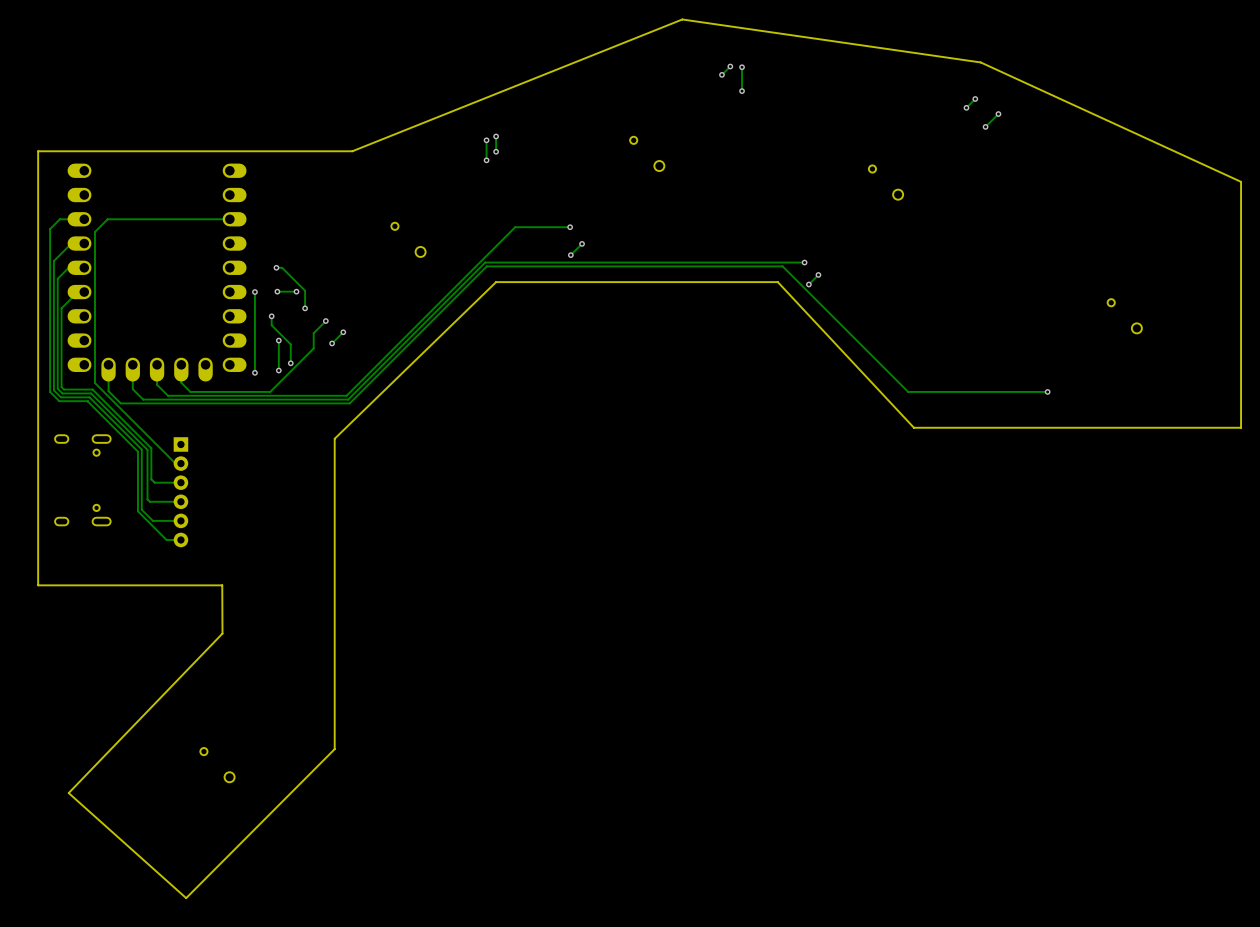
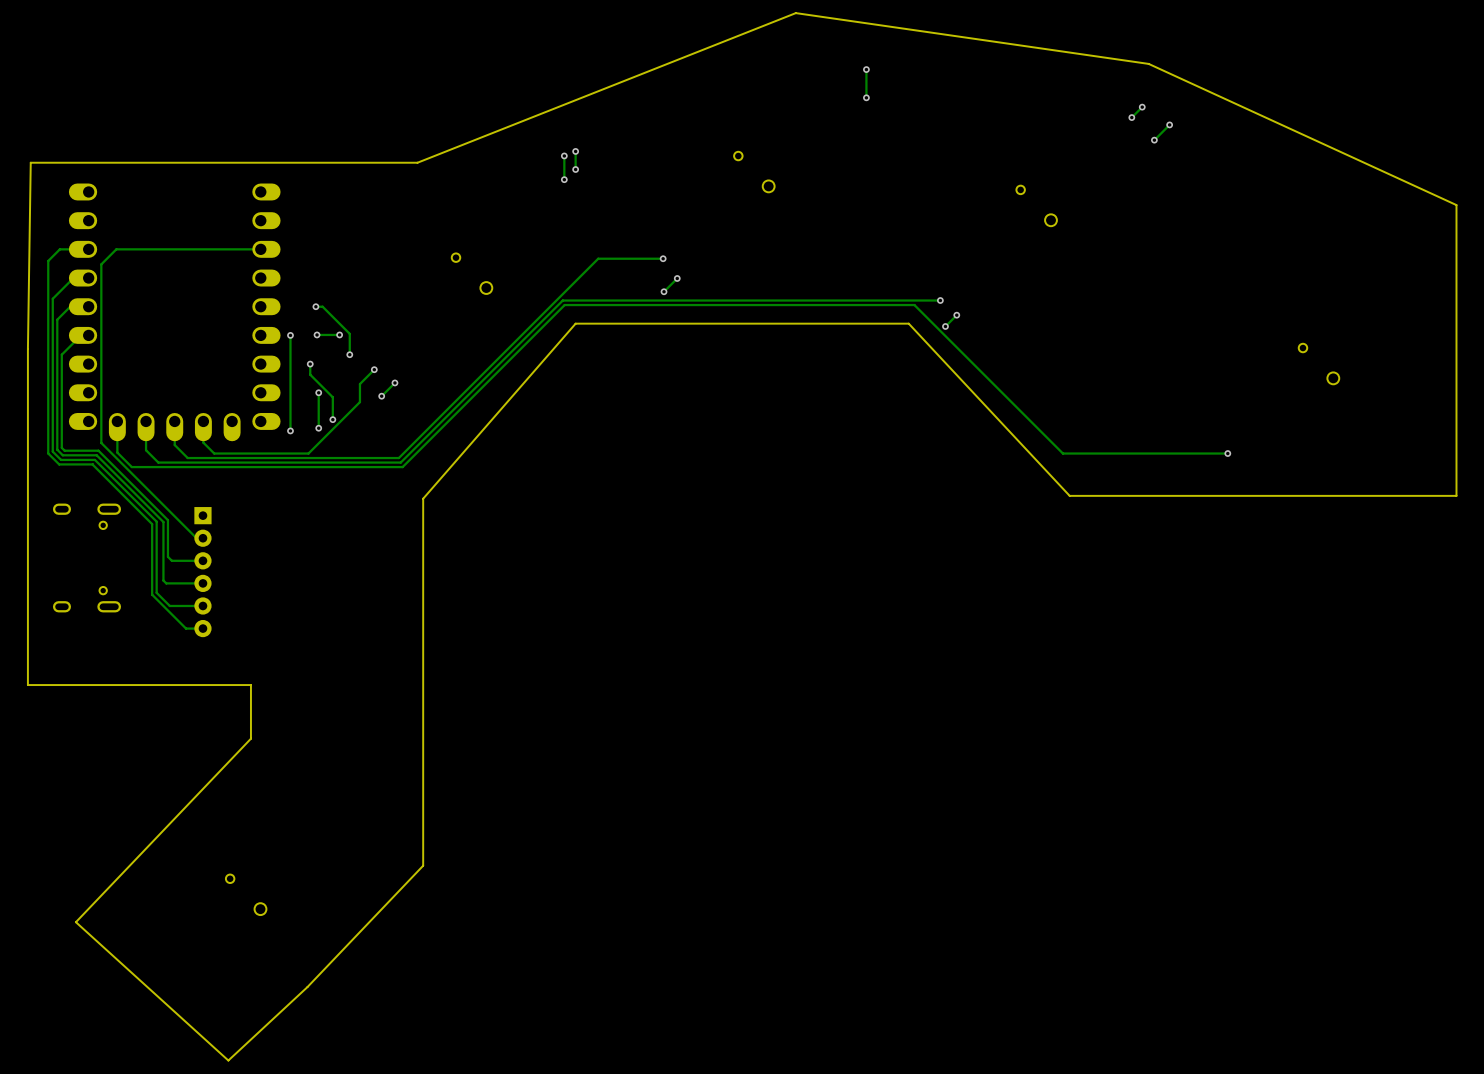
board edge: (682, 19) (352, 151) (38, 151) (38, 585) (222, 585) (222, 633) (68, 793) (186, 898) (334, 749) (334, 438) (496, 282) -> (795, 13) (417, 162) (30, 162) (27, 349) (27, 685) (250, 685) (250, 738) (75, 922) (228, 1060) (307, 987) (423, 865) (423, 498) (575, 323)
track: (730, 66) (721, 74) -> none
via: (730, 66) -> none
via: (721, 74) -> none

